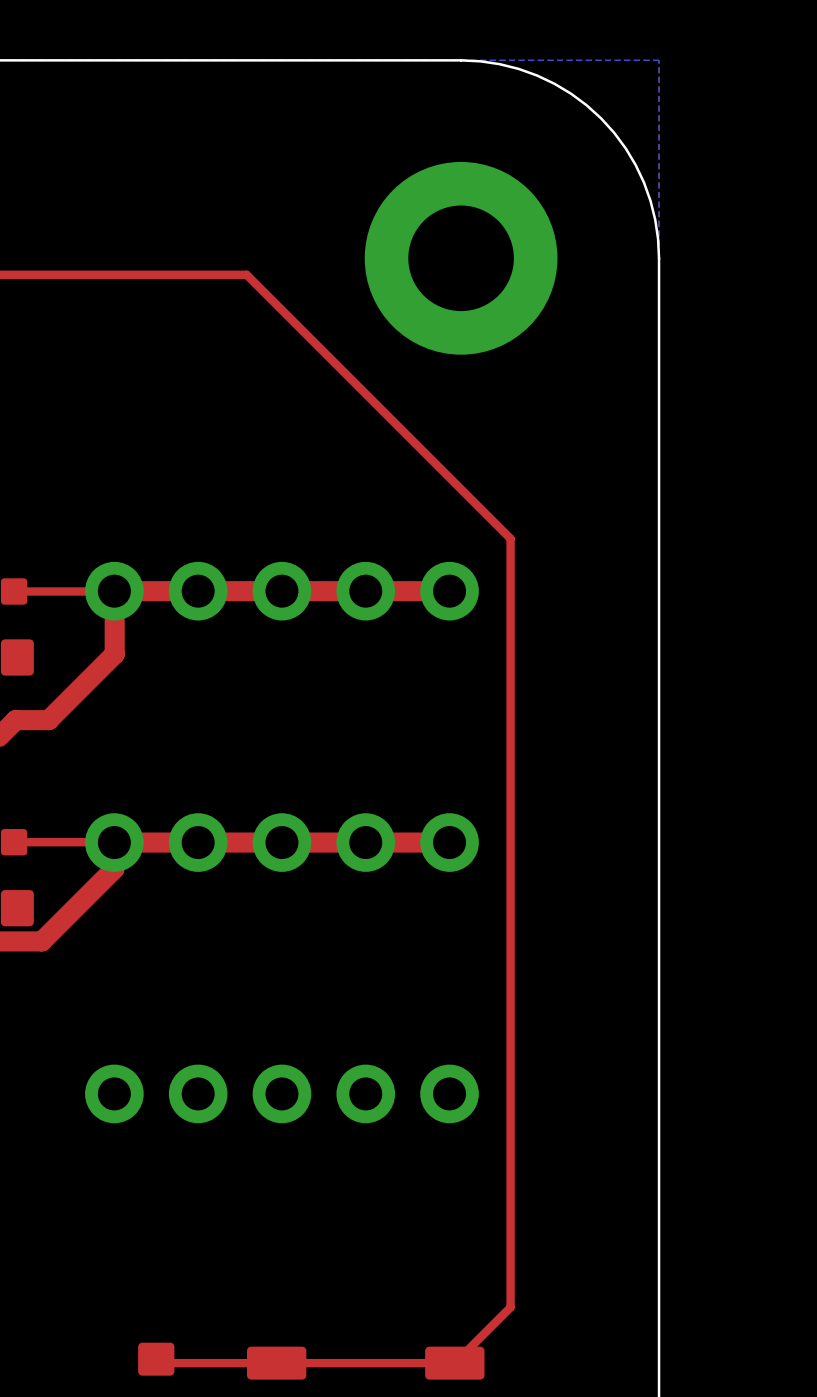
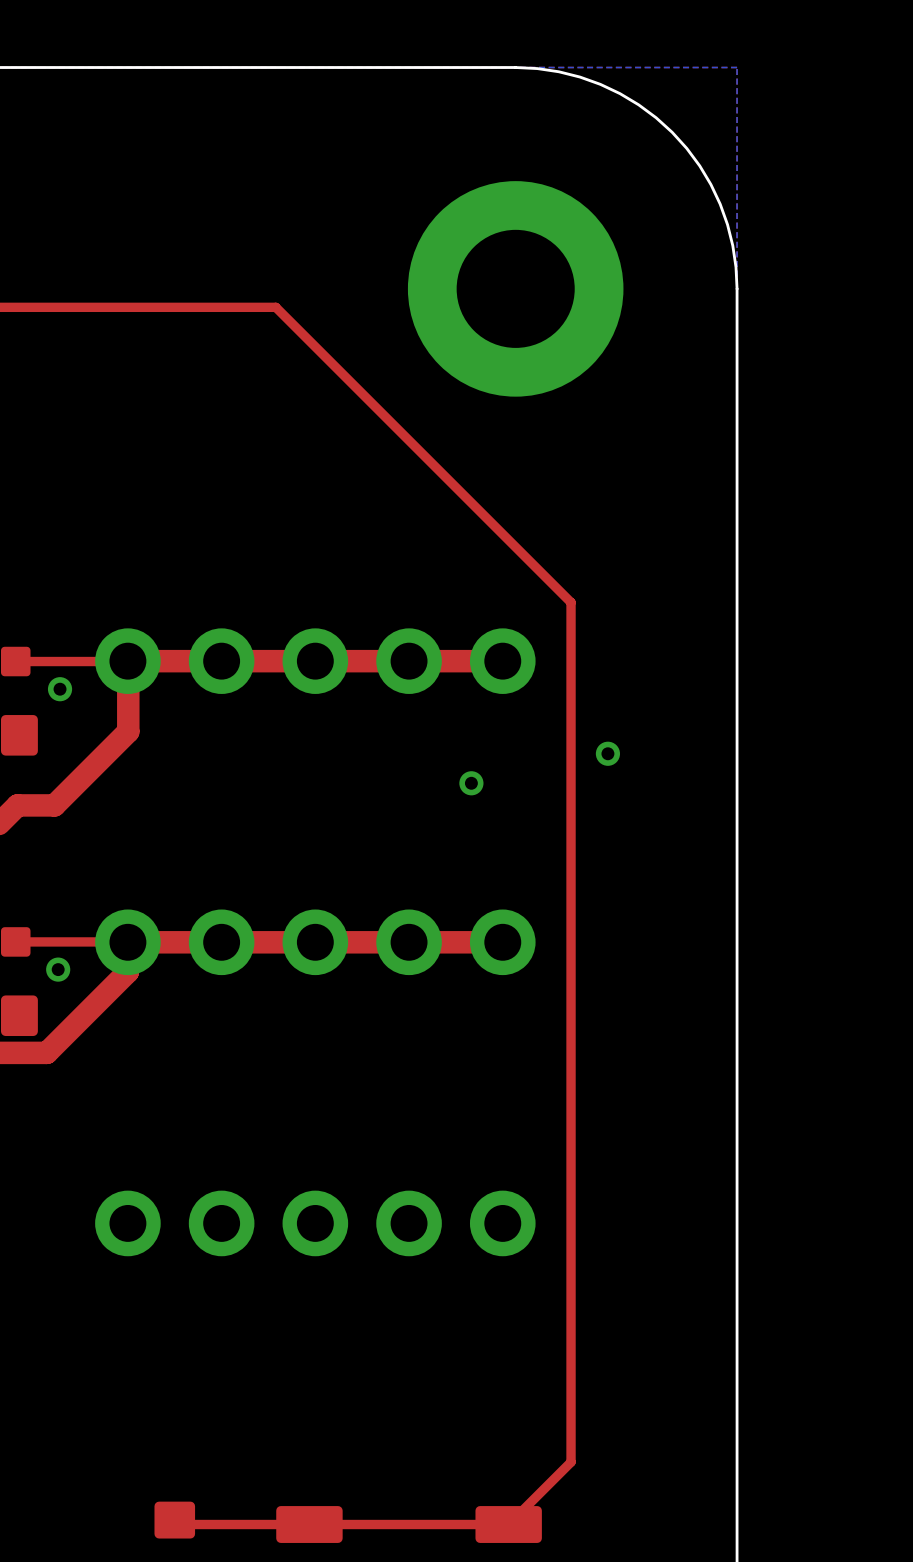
via: none -> (60, 689)
via: none -> (607, 753)
via: none -> (471, 783)
via: none -> (58, 969)

